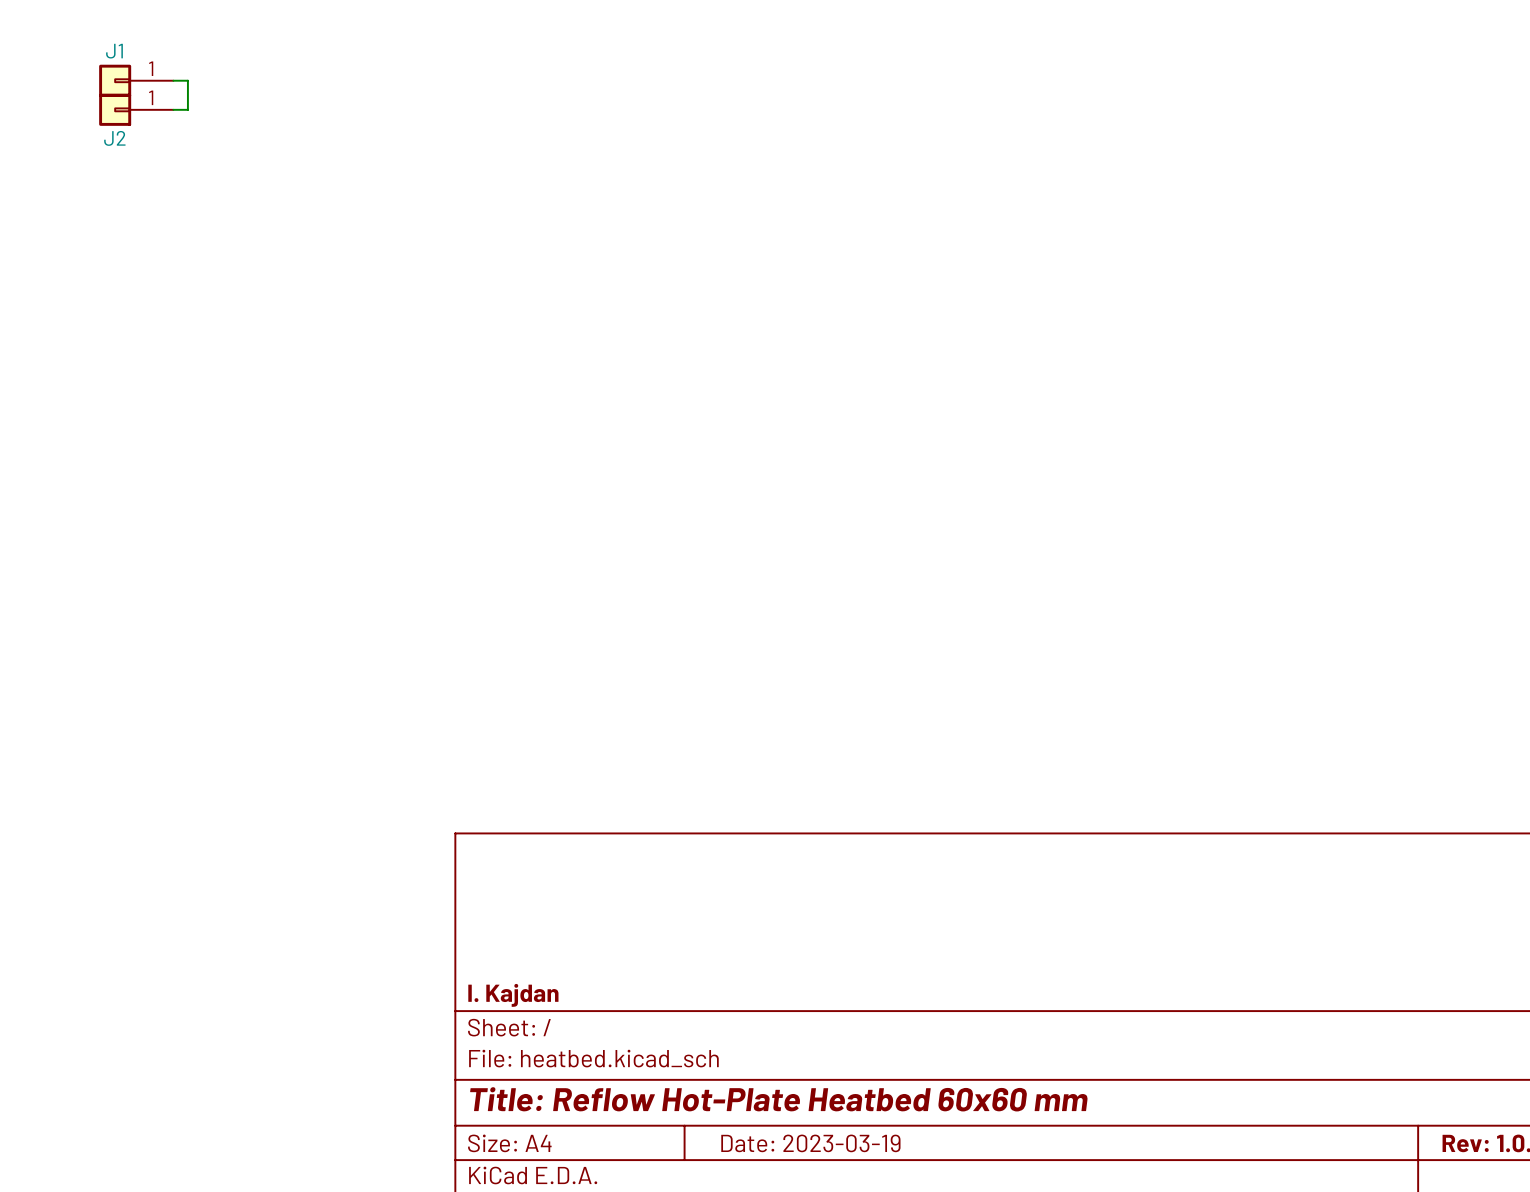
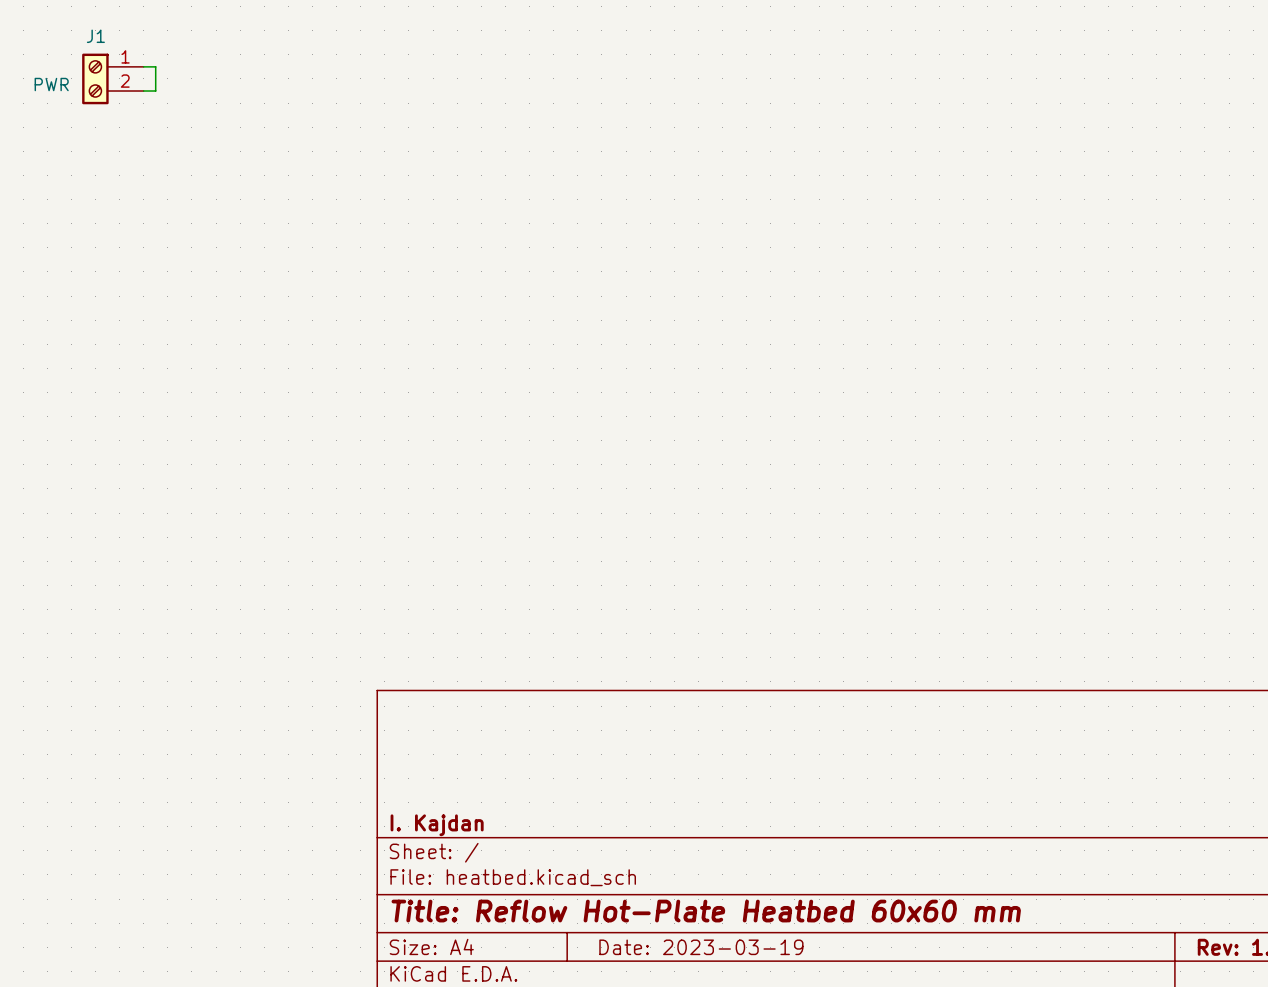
J1 symbol: [99, 64, 174, 97] -> [82, 53, 144, 105]
J1 value: none -> PWR (51, 84)
J2: (136, 109) -> none

